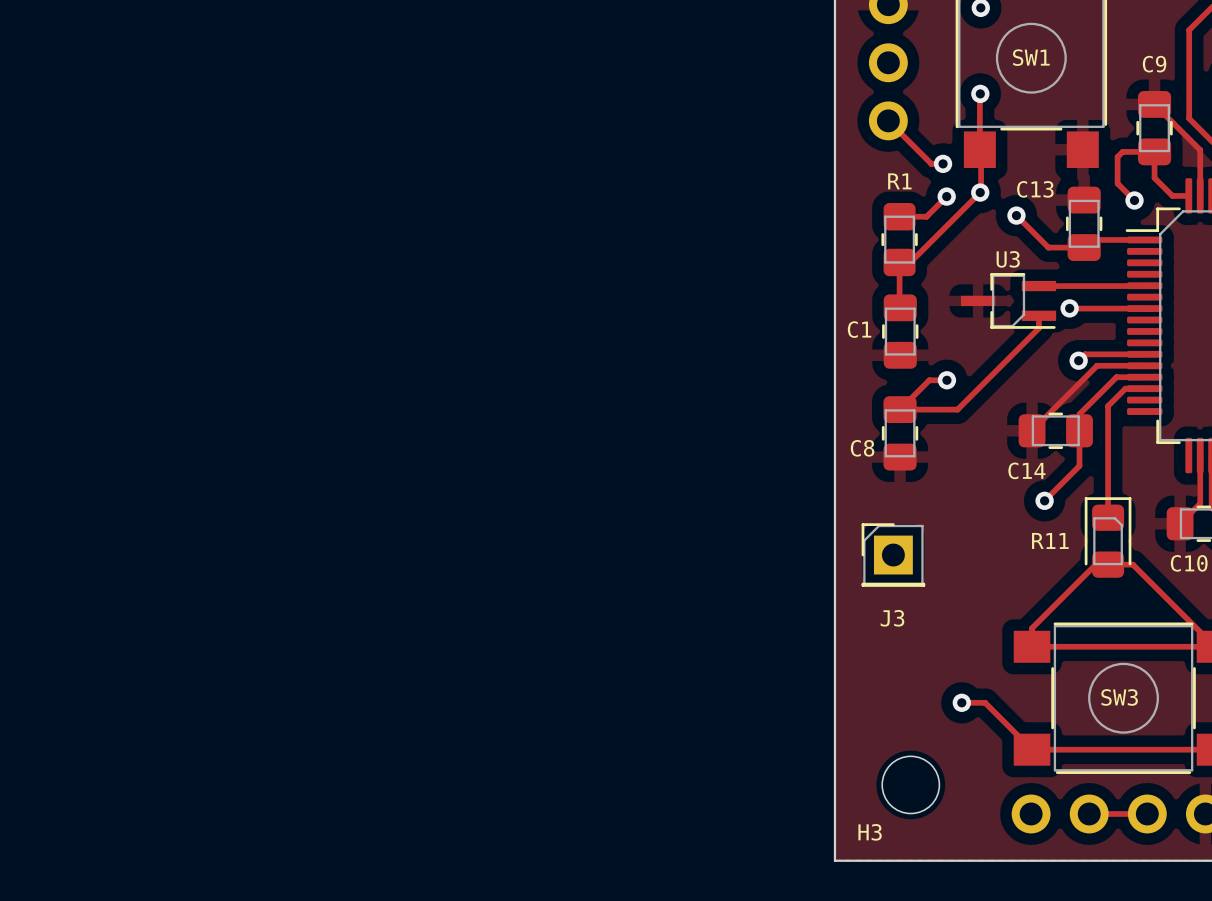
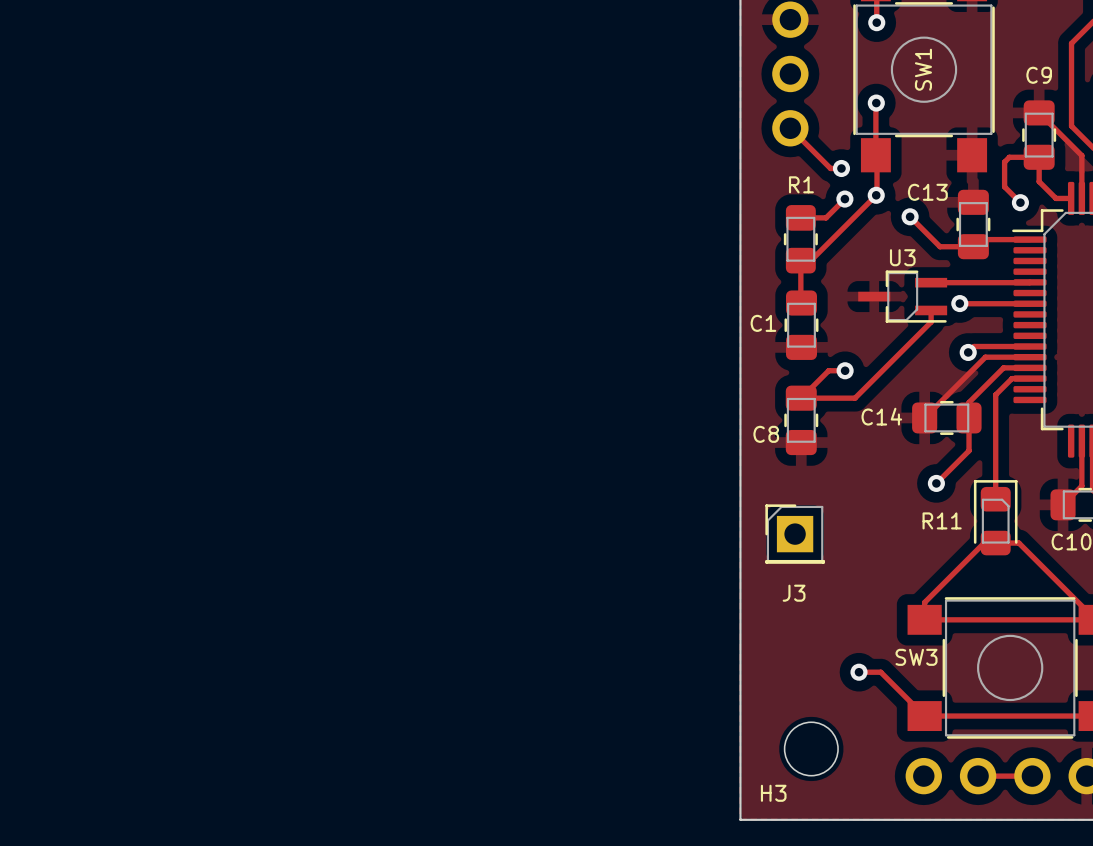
SW1 name rotation: 0° (1031, 57) -> 90° counterclockwise (923, 69)
C14 name position: C14 (1026, 470) -> C14 (881, 416)
SW3 name position: SW3 (1119, 697) -> SW3 (916, 657)

